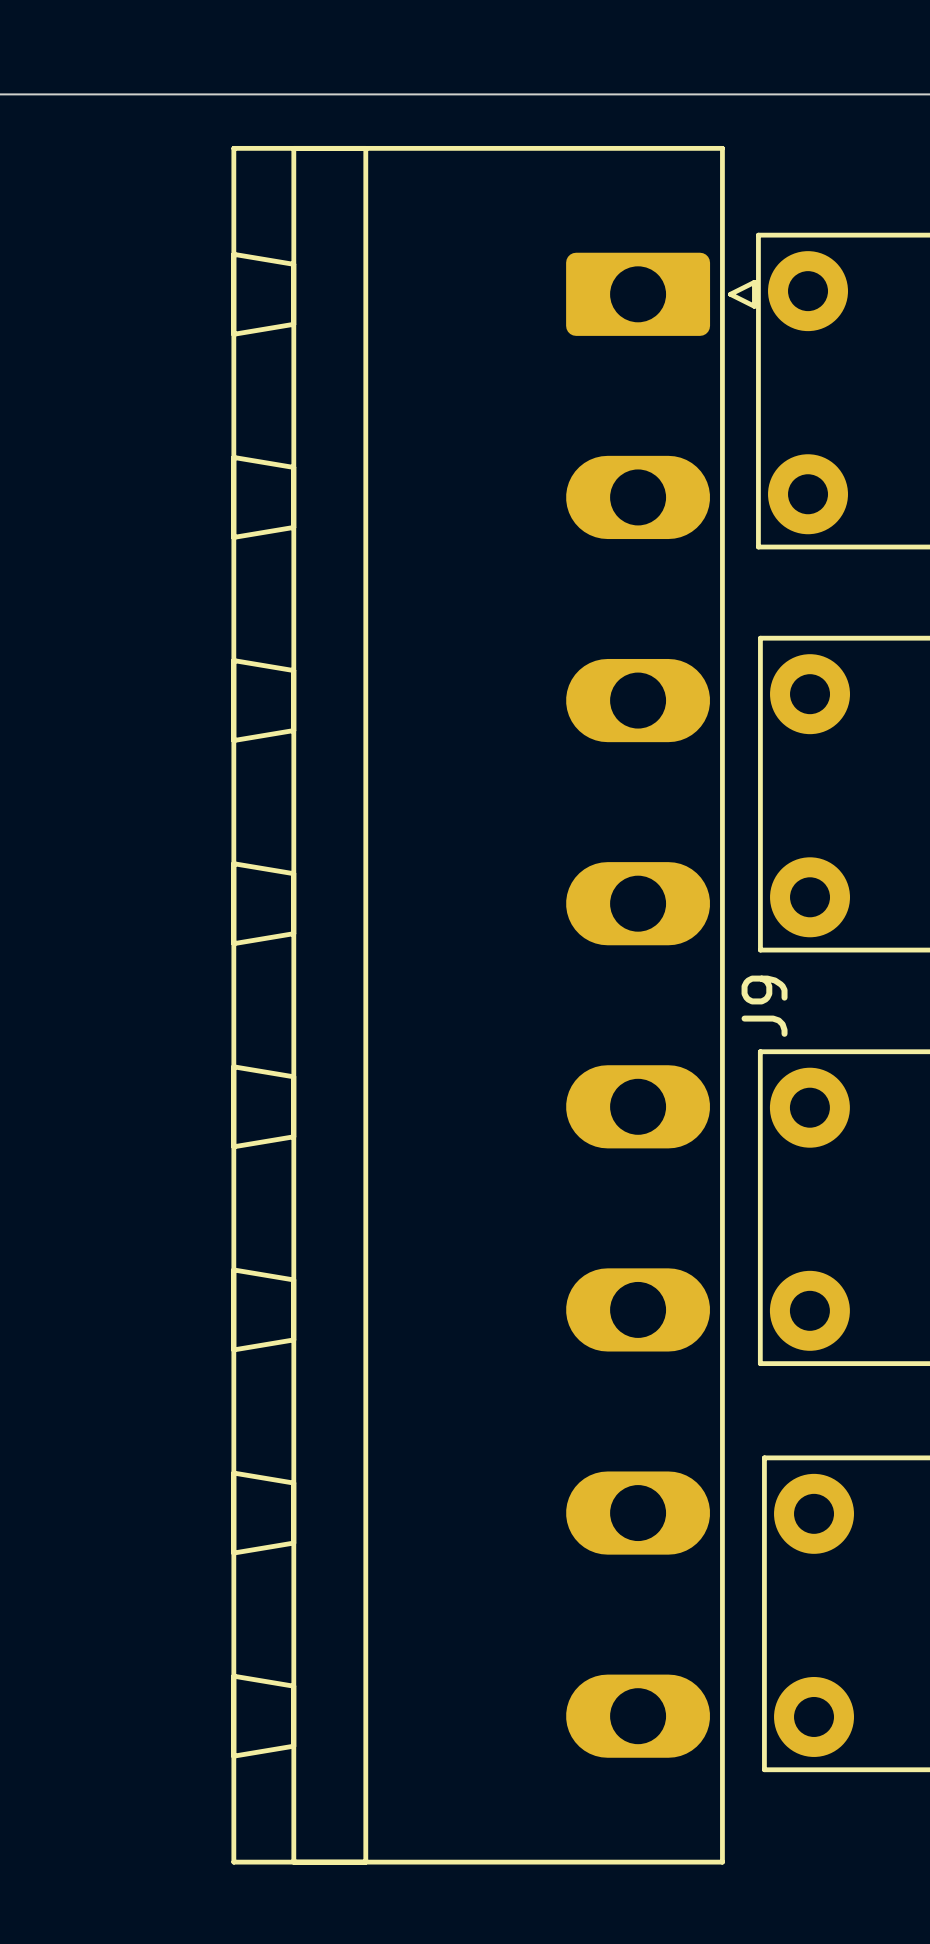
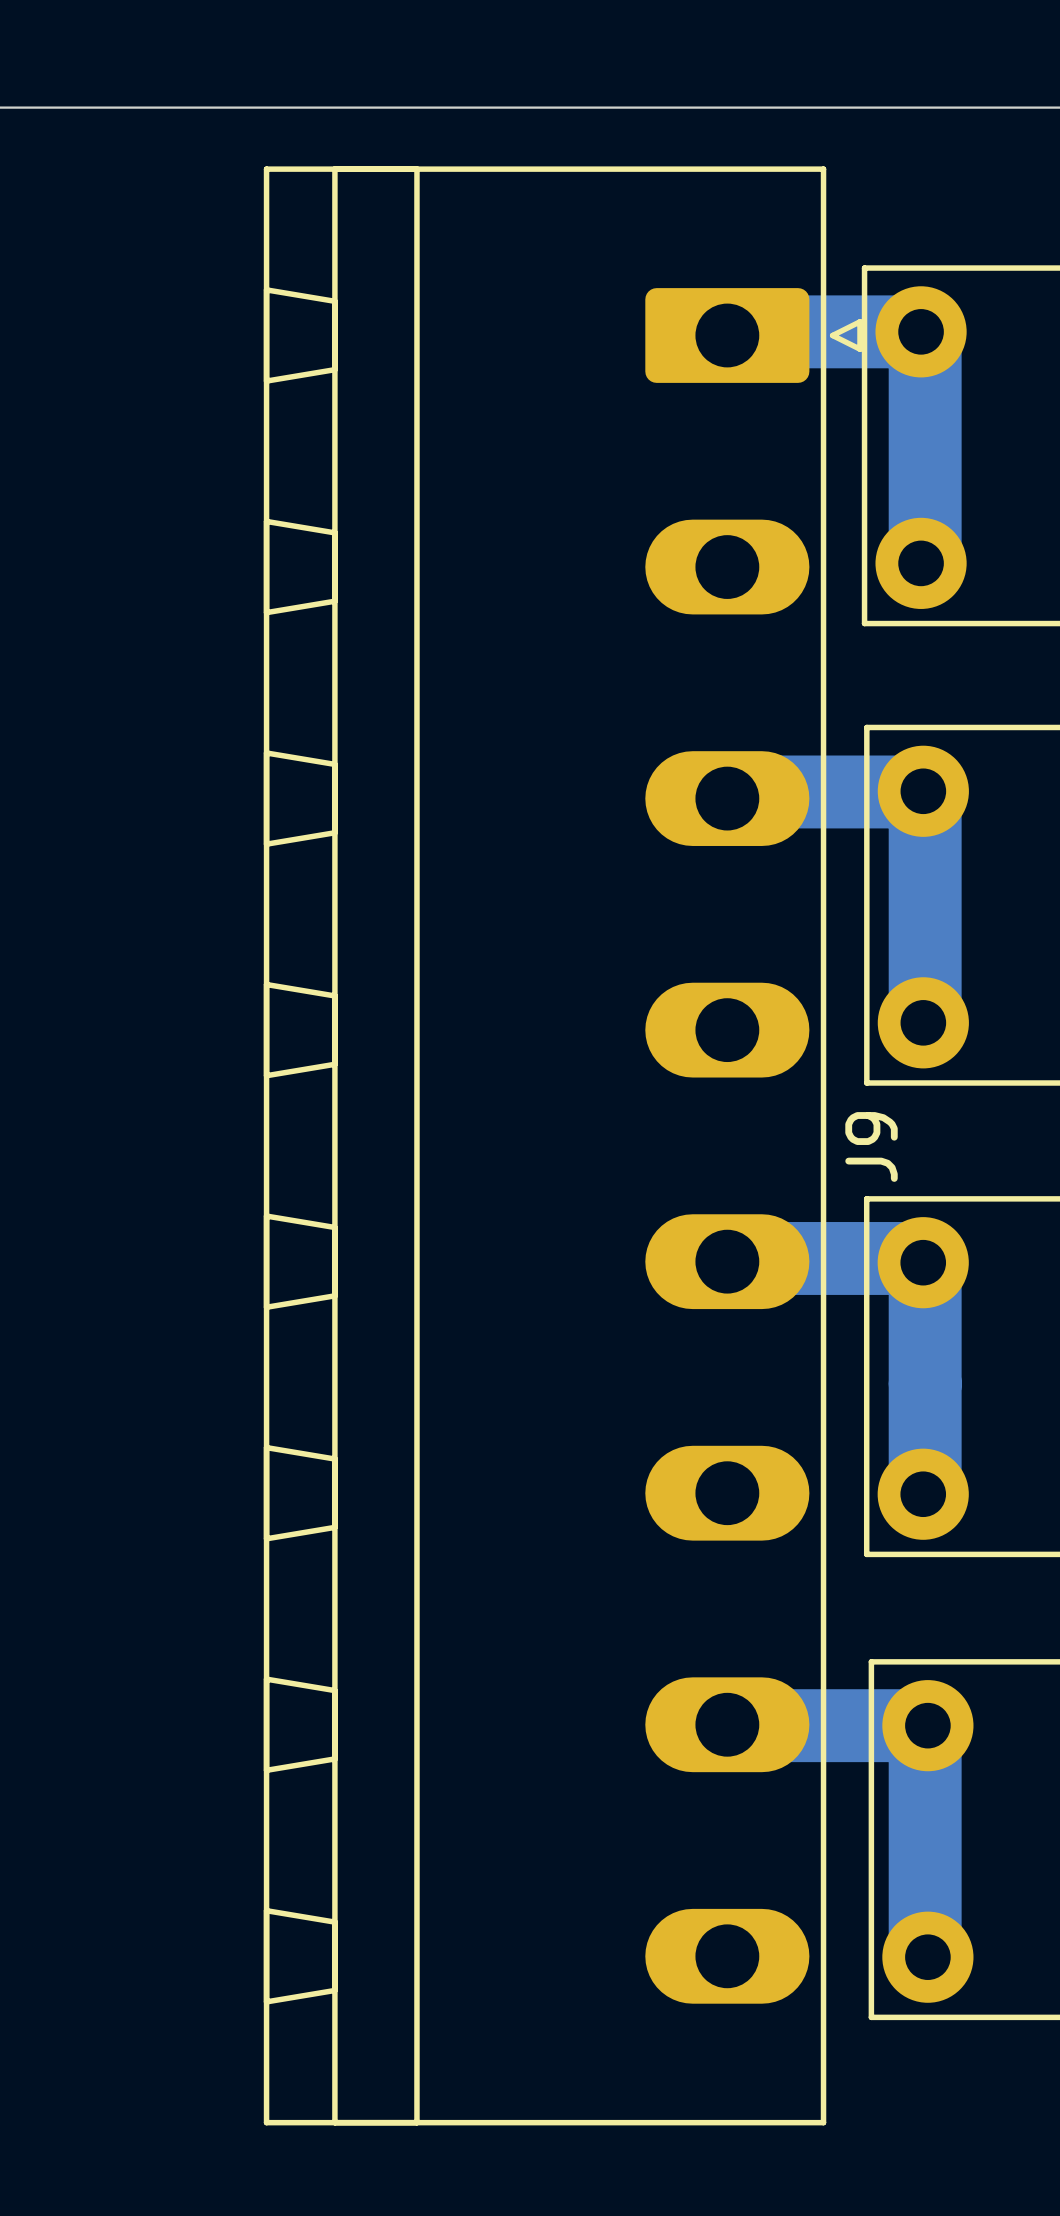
bottom track: none -> (731, 331) (925, 331) (925, 563)
bottom track: none -> (733, 791) (925, 791) (925, 1023)
bottom track: none -> (730, 1258) (925, 1258) (925, 1490)
bottom track: none -> (728, 1725) (925, 1725) (925, 1957)

